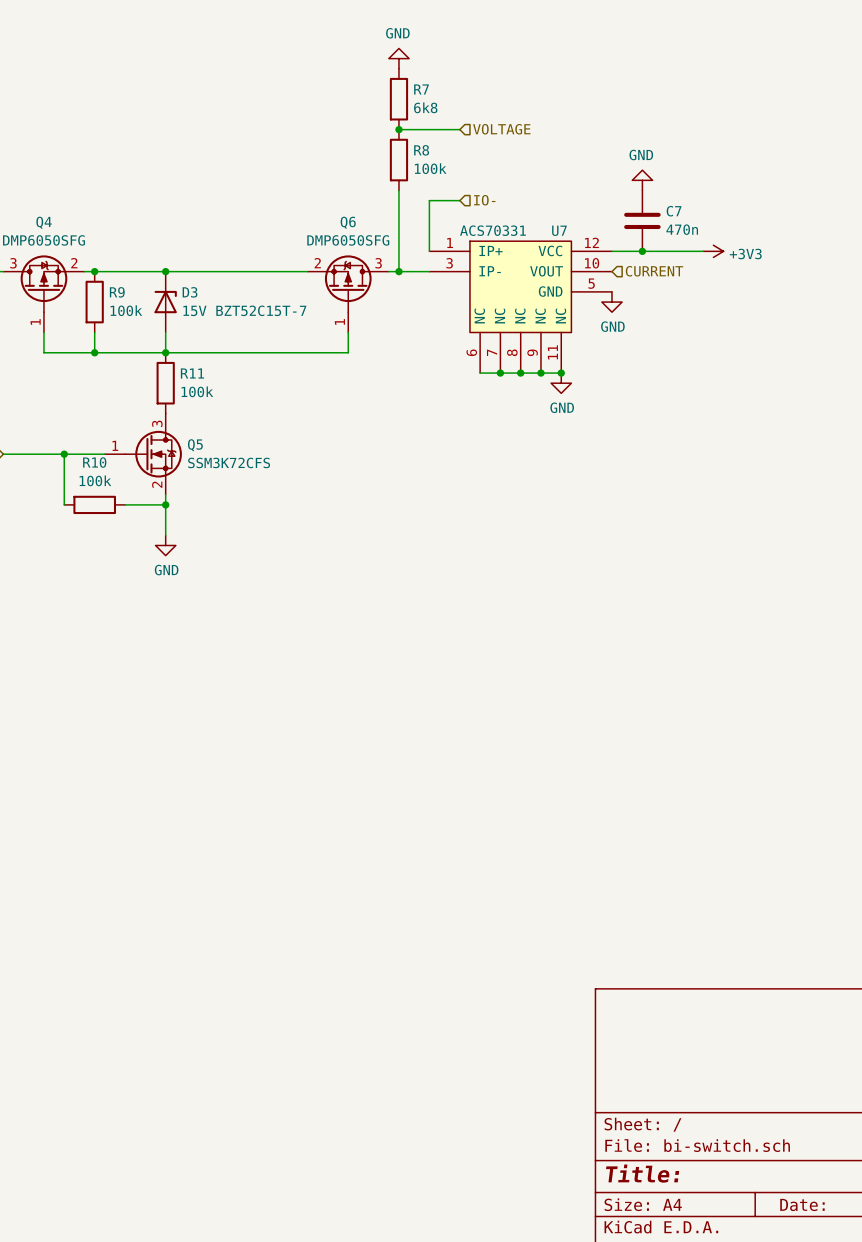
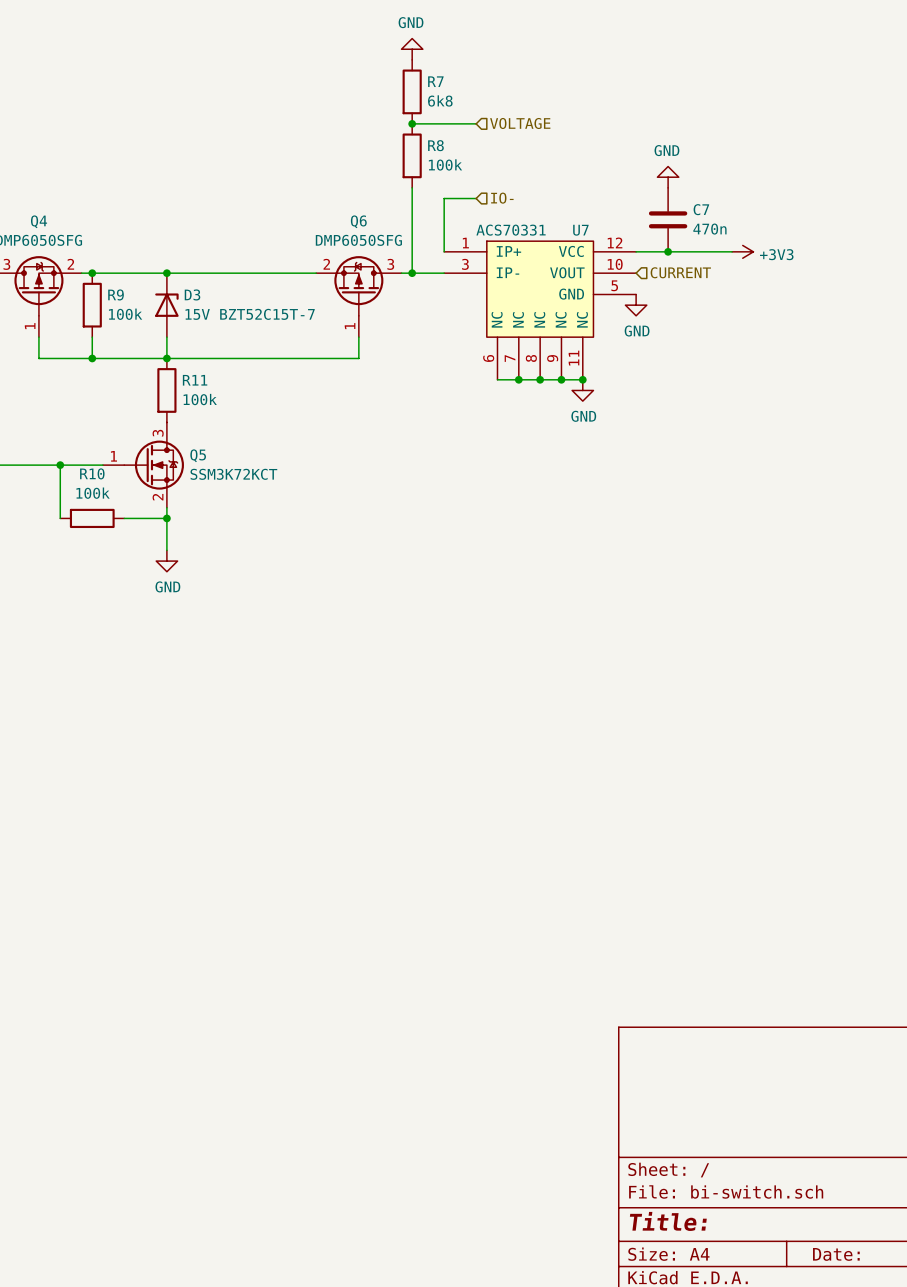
Q5 value: SSM3K72CFS (229, 462) -> SSM3K72KCT (233, 474)

